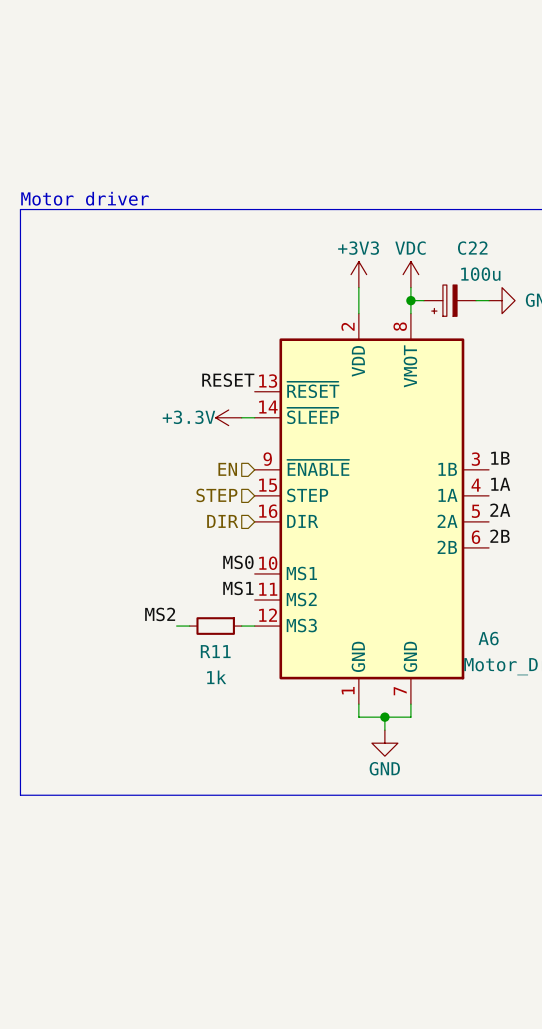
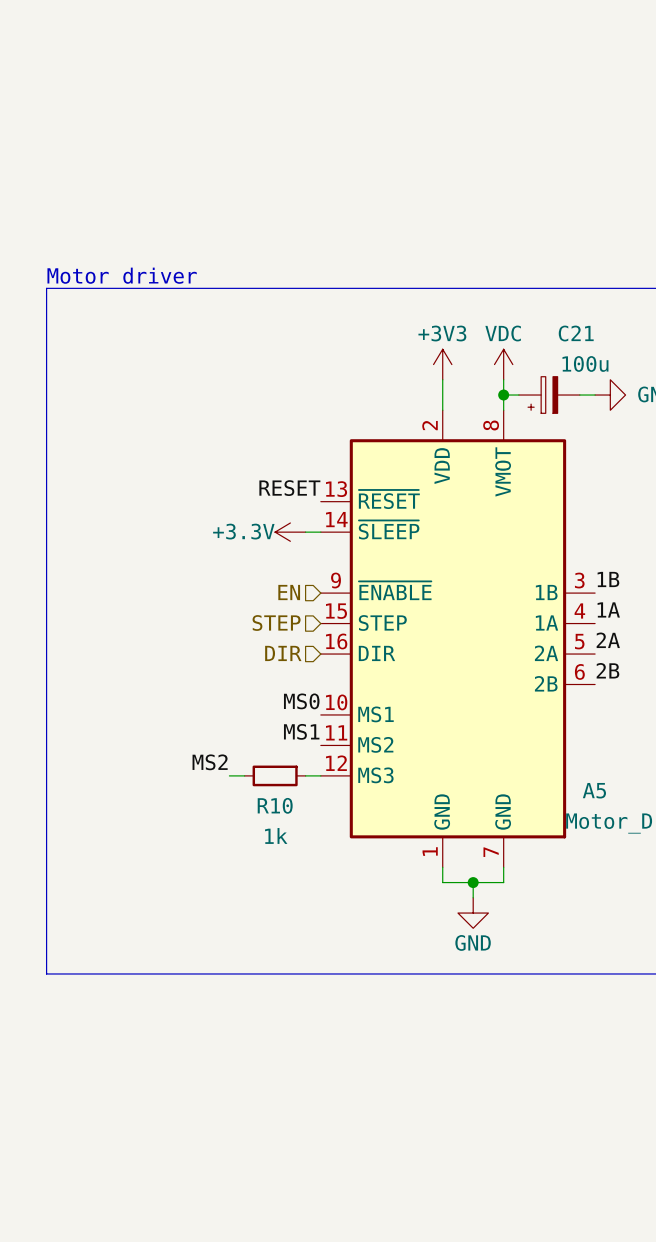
C22 name: C22 (472, 248) -> C21 (576, 333)
A6 name: A6 (488, 638) -> A5 (594, 790)
R11 name: R11 (215, 651) -> R10 (275, 805)

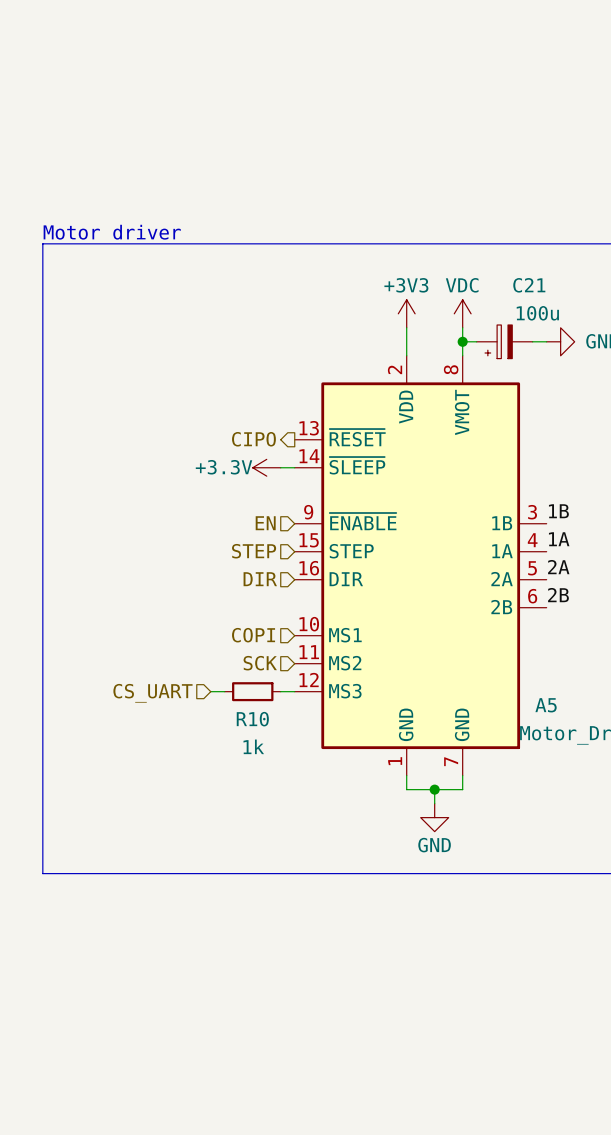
label: RESET (289, 488) -> none
hierarchical label: none -> CIPO (253, 439)
label: MS0 (301, 701) -> none
hierarchical label: none -> COPI (253, 635)
label: MS1 (301, 731) -> none
hierarchical label: none -> SCK (260, 663)
label: MS2 (210, 762) -> none
hierarchical label: none -> CS_UART (152, 693)

